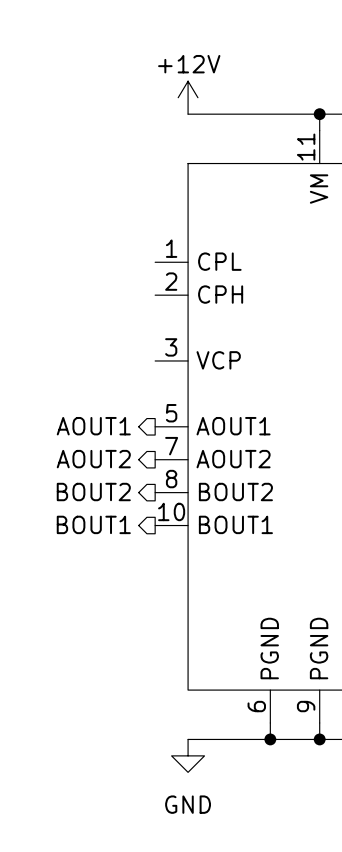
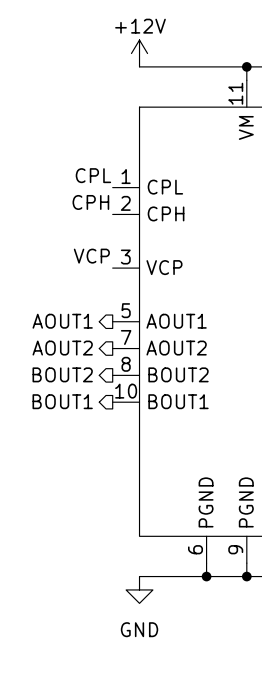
label: none -> CPL (93, 175)
label: none -> CPH (90, 202)
label: none -> VCP (91, 256)

